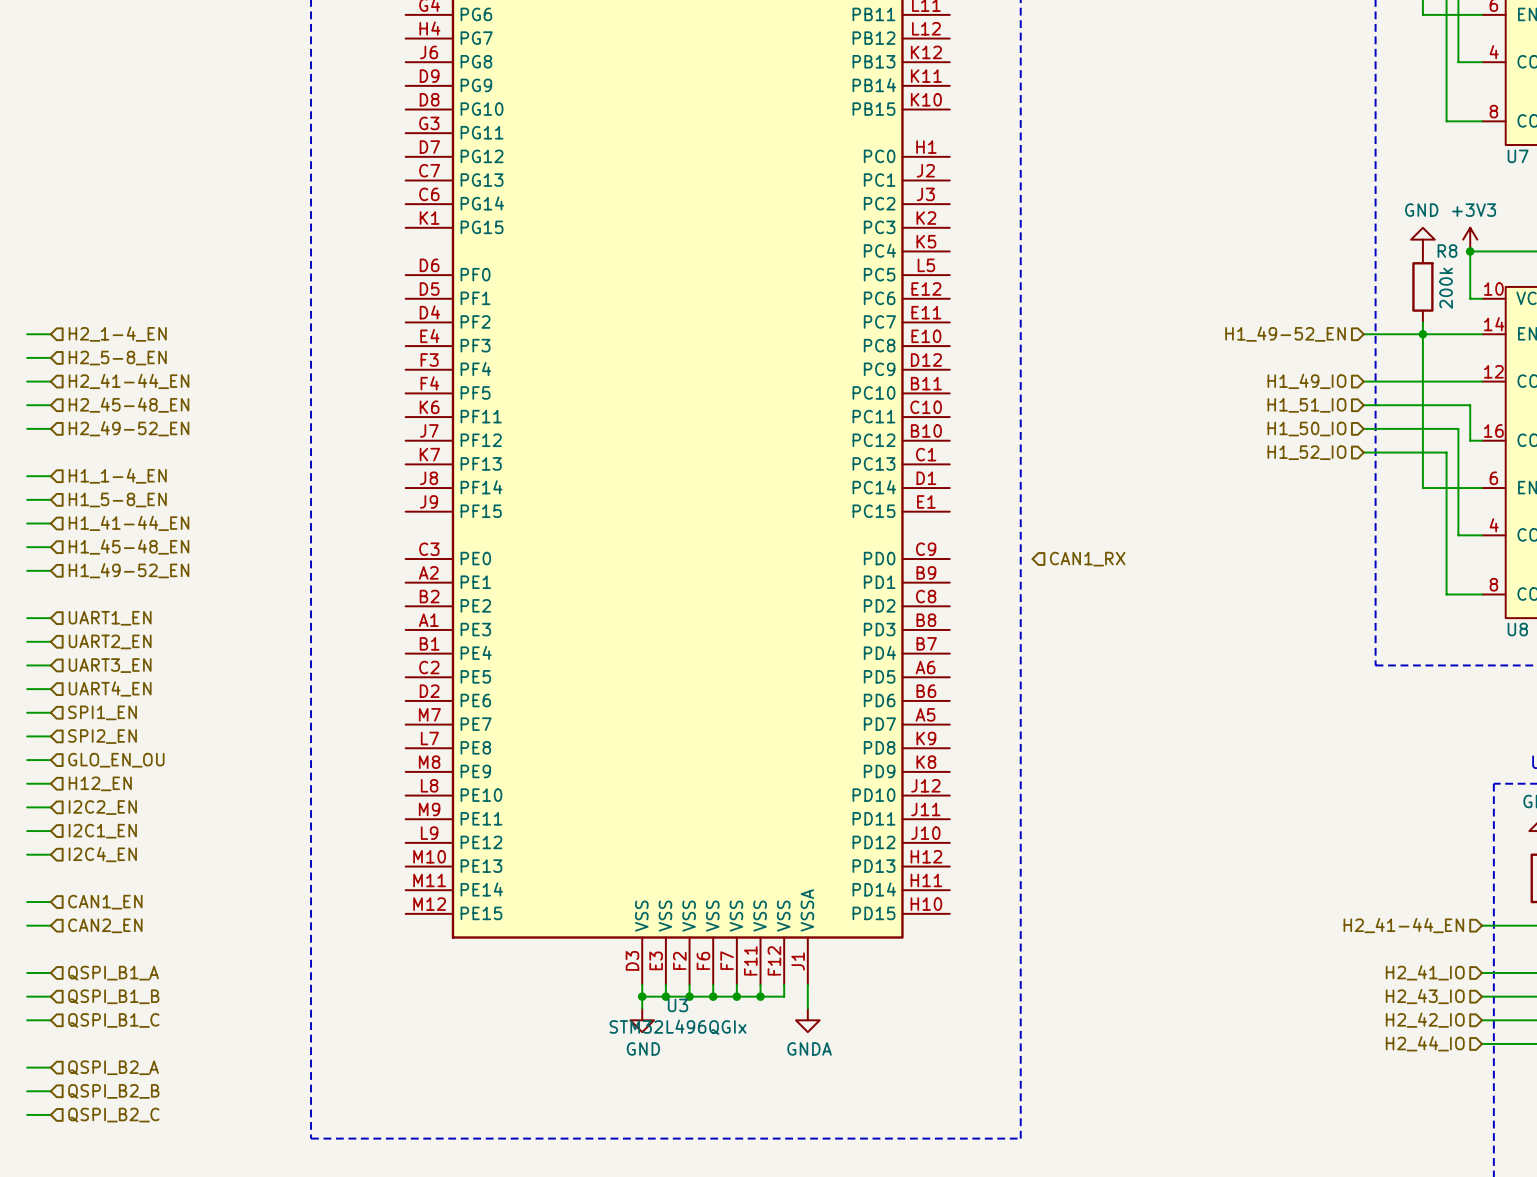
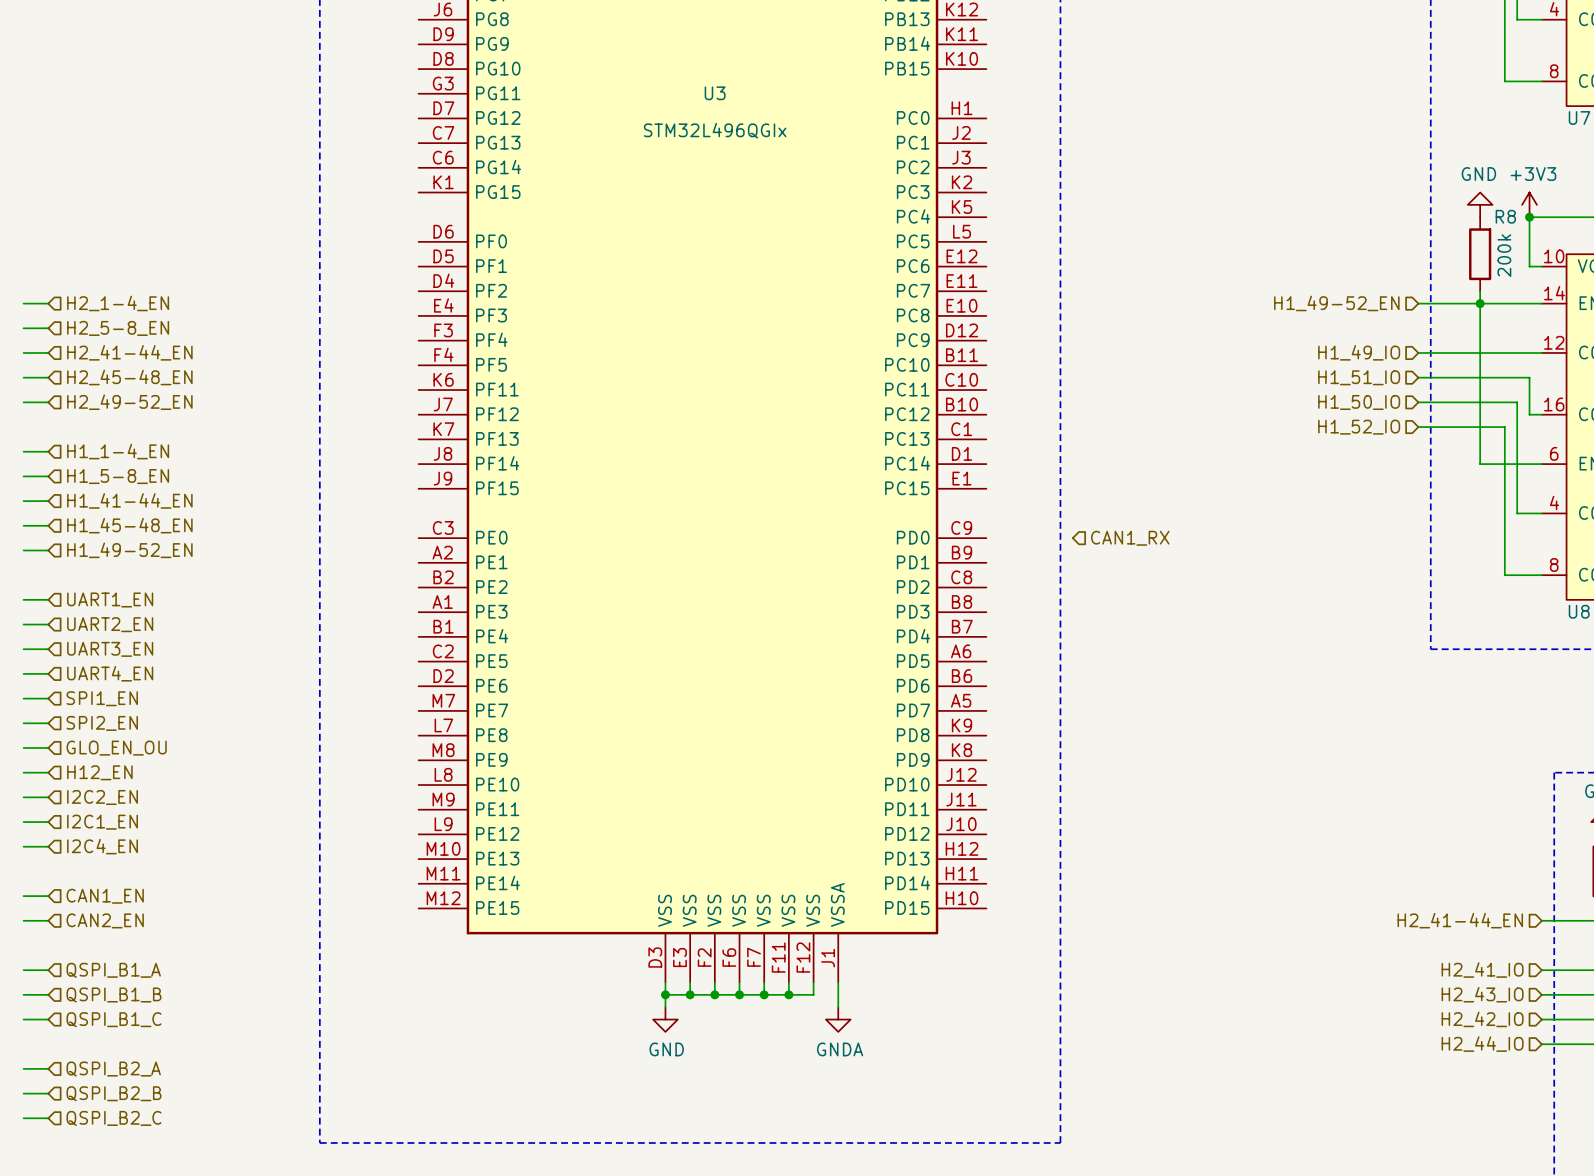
U3 name position: U3 (678, 1005) -> U3 (715, 93)
U3 value position: STM32L496QGIx (678, 1027) -> STM32L496QGIx (715, 130)

